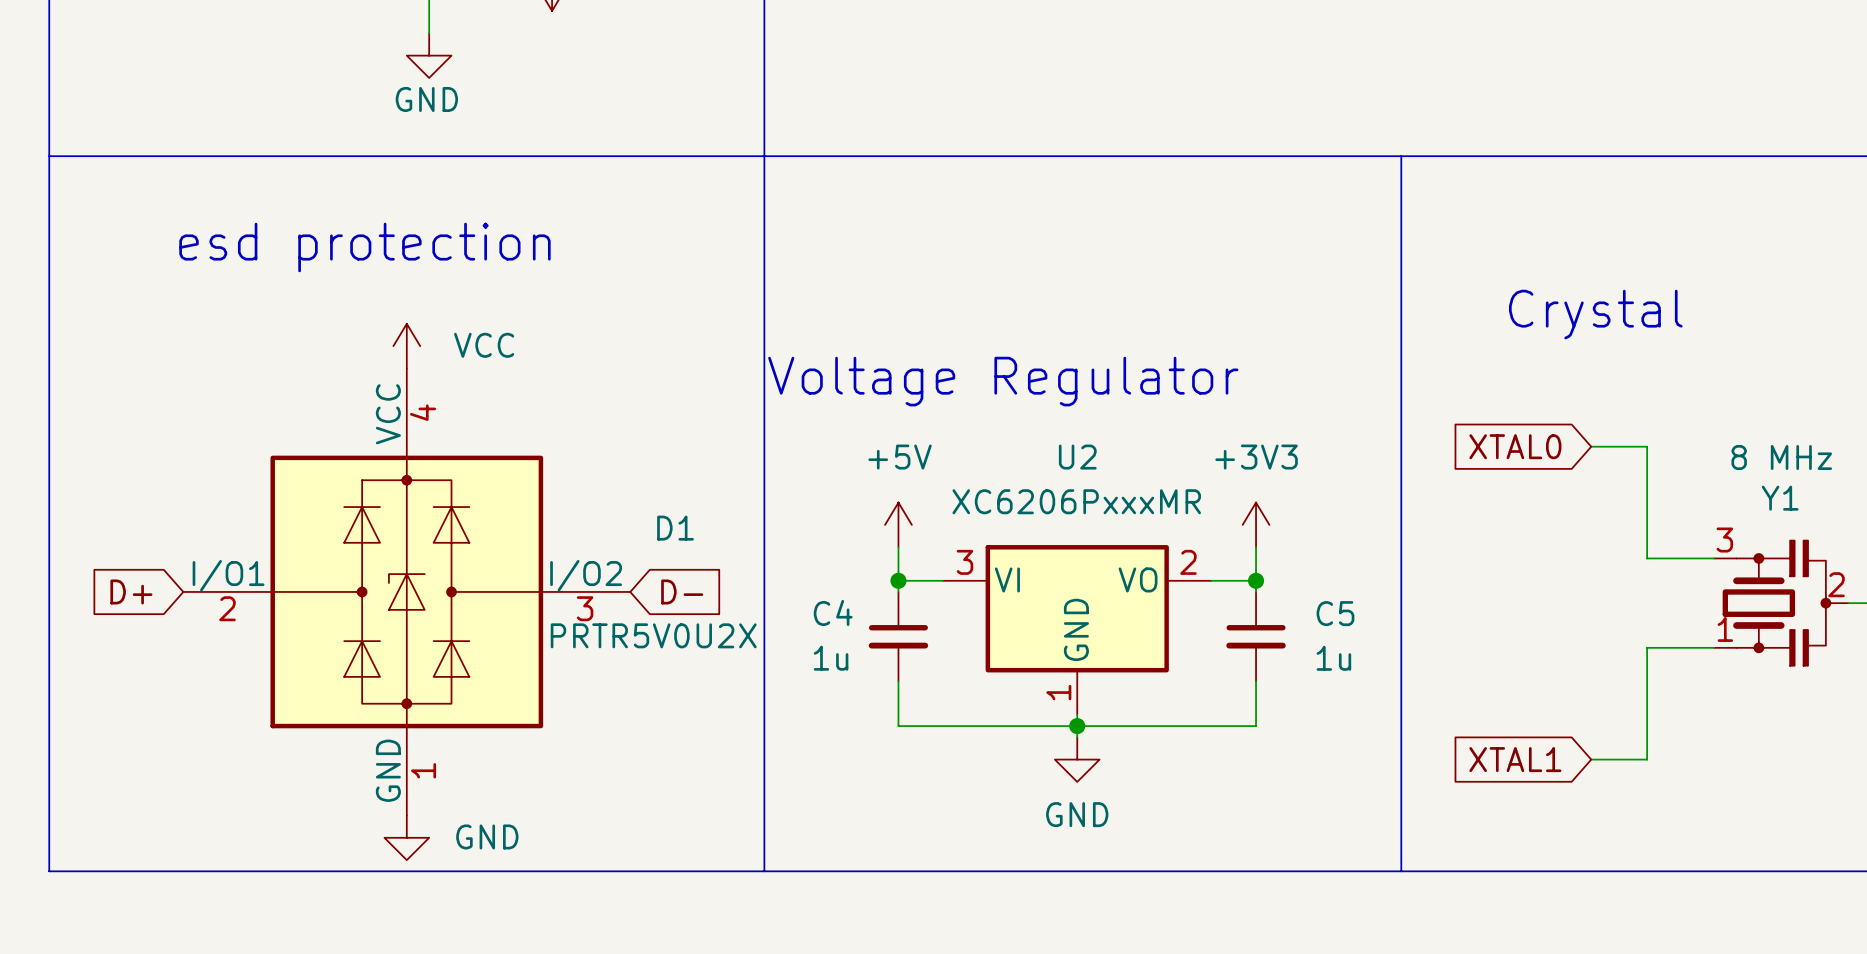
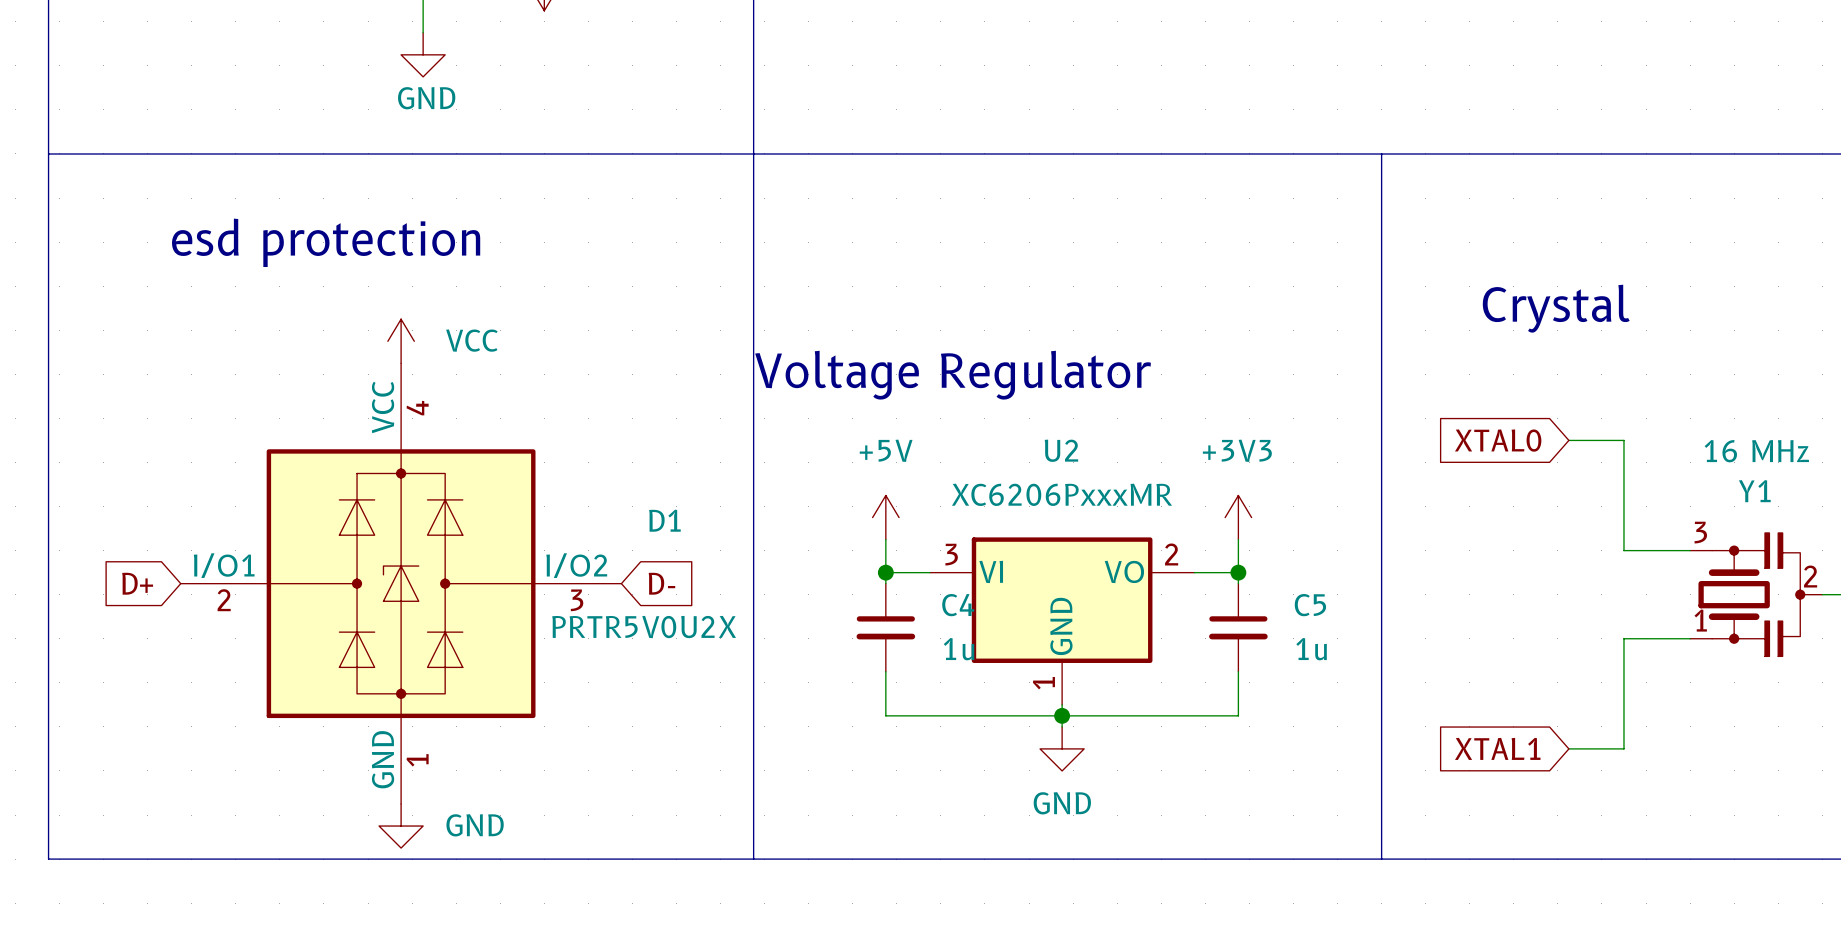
Y1 value: 8 MHz (1781, 457) -> 16 MHz (1756, 451)
C4 name position: C4 (833, 612) -> C4 (958, 605)
C4 value position: 1u (831, 658) -> 1u (959, 649)

